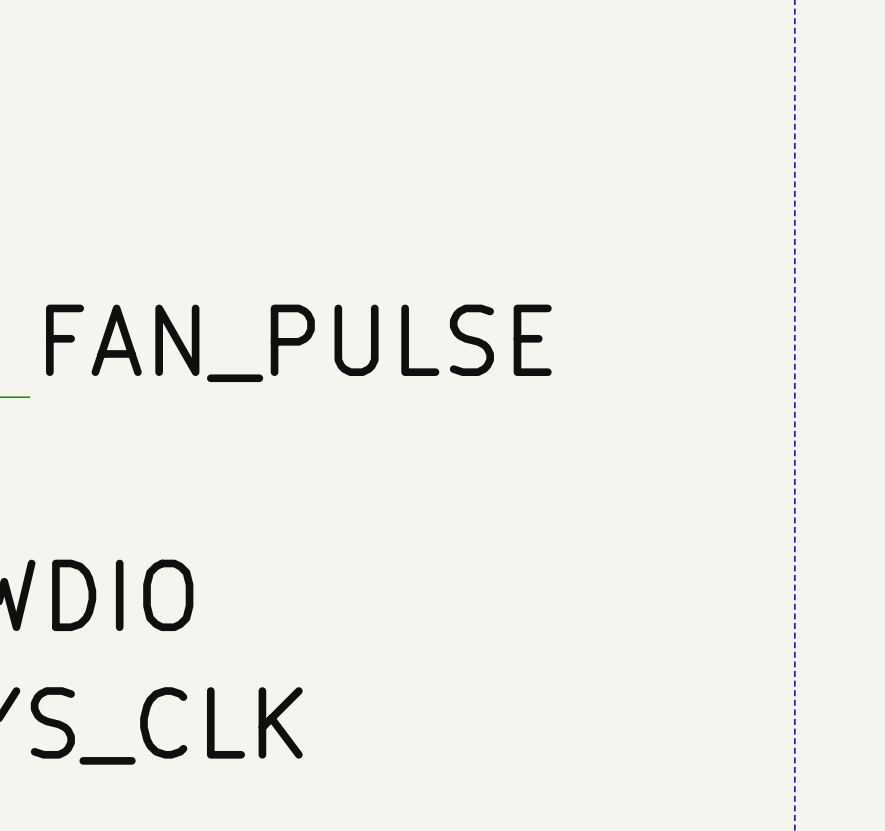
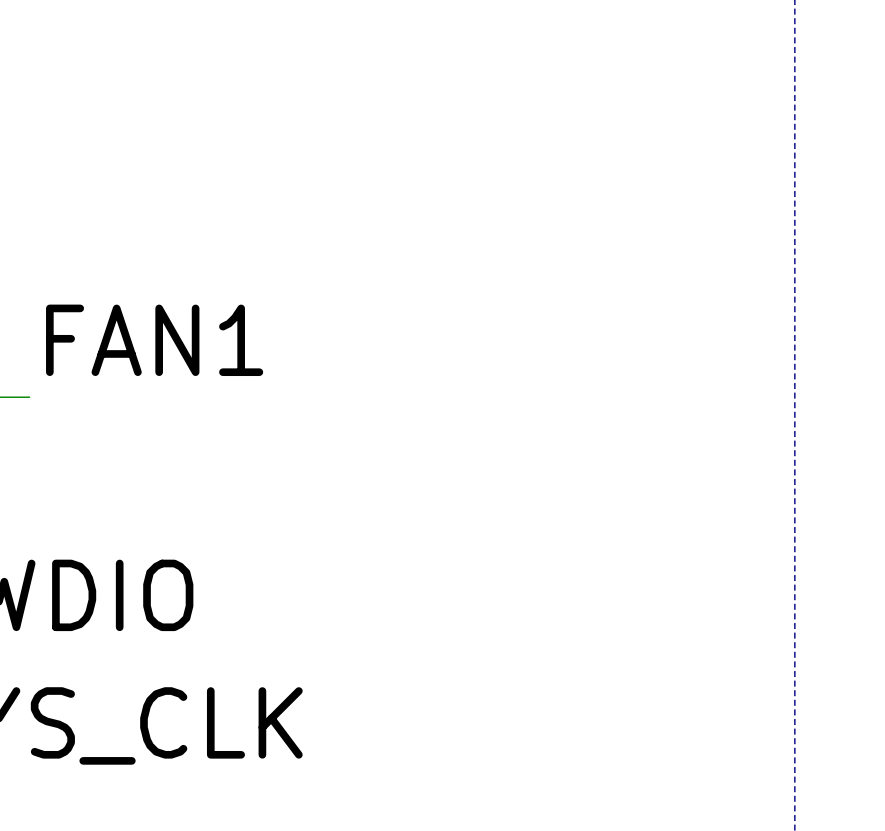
label: FAN_PULSE (298, 343) -> FAN1 (154, 340)

